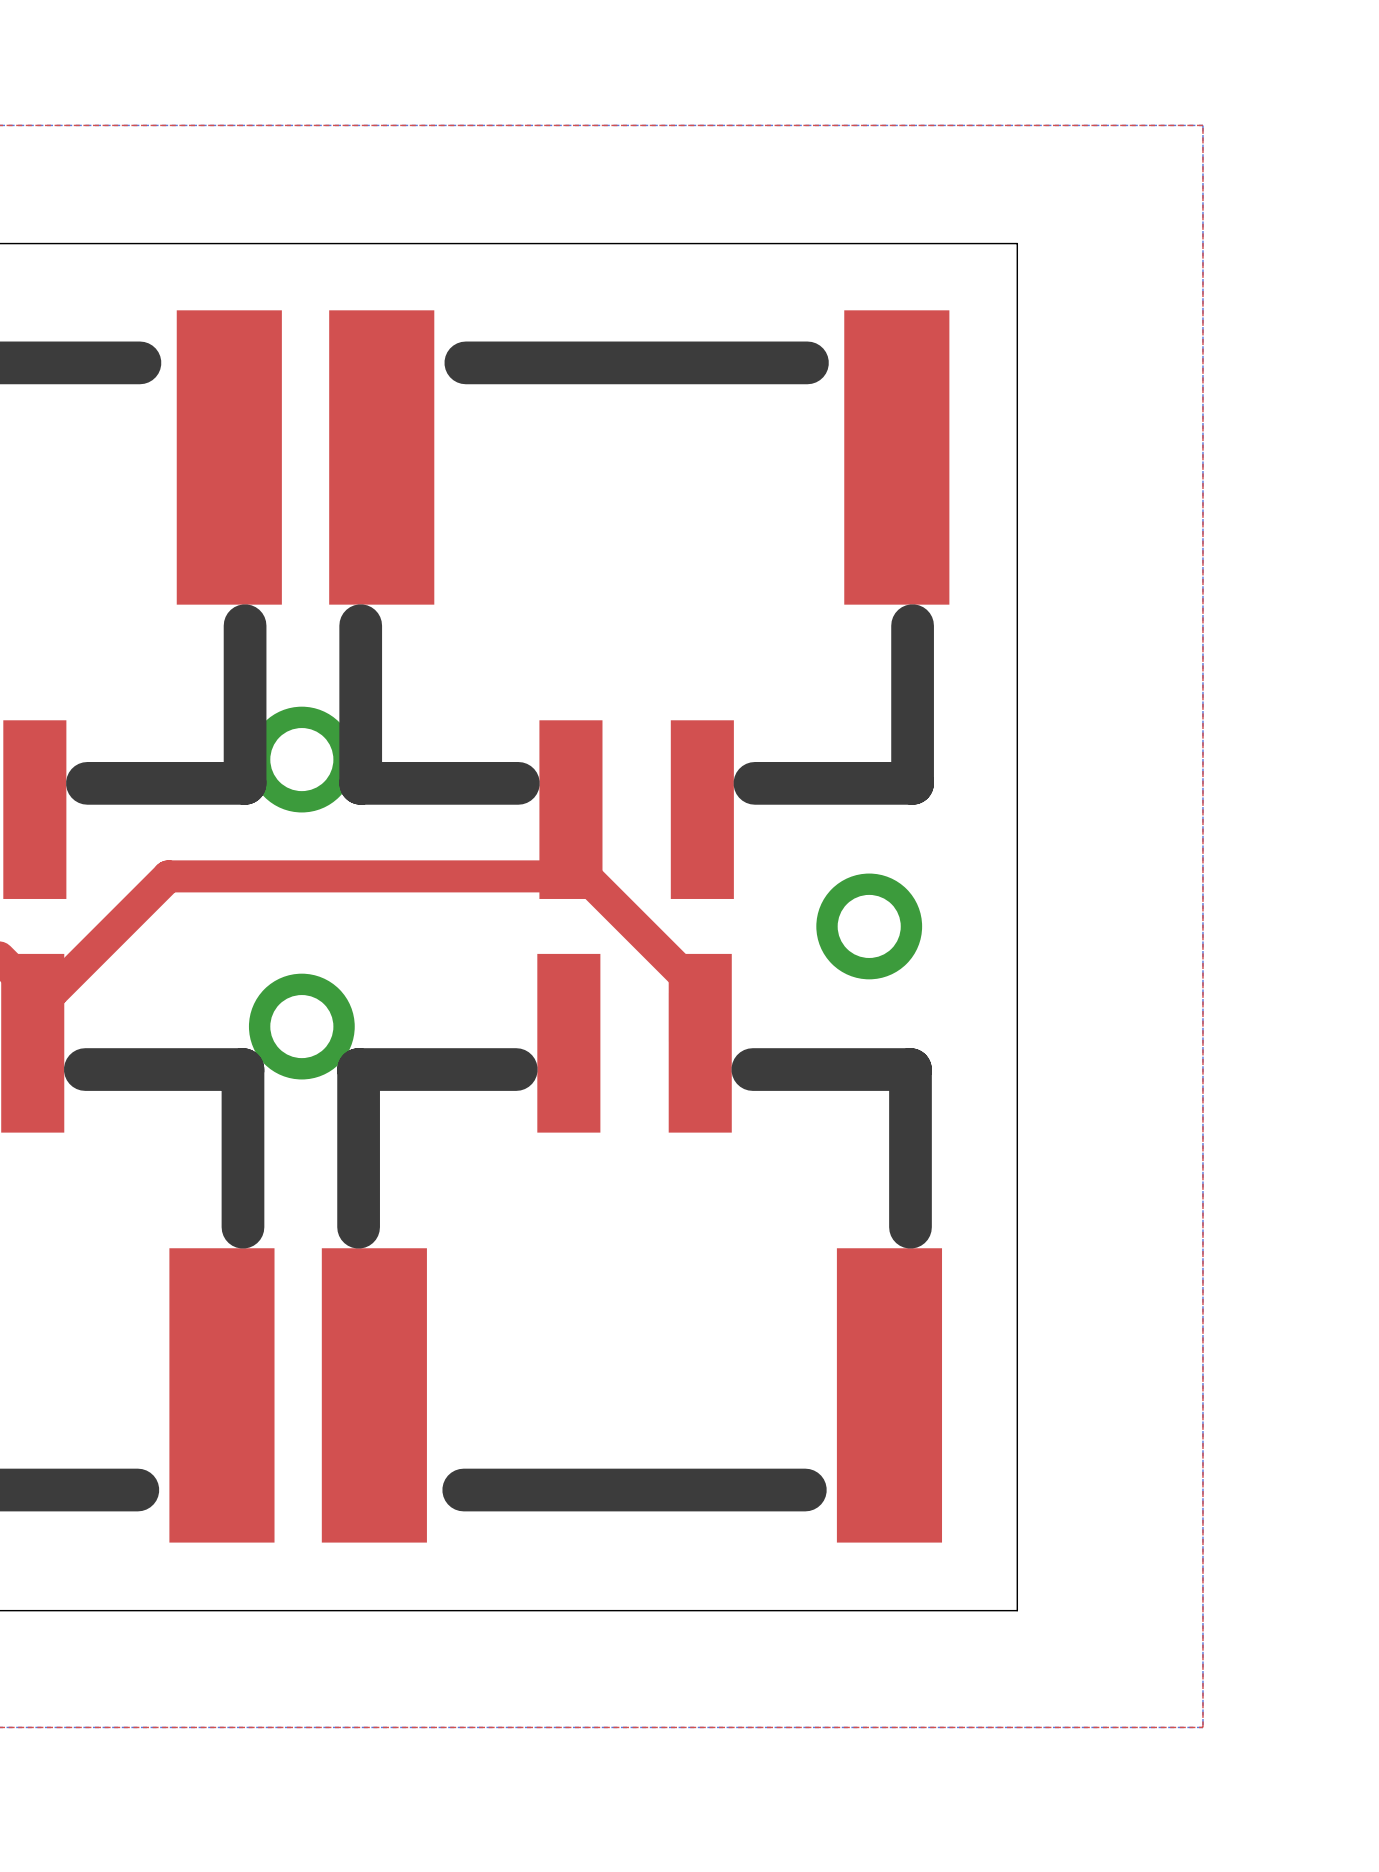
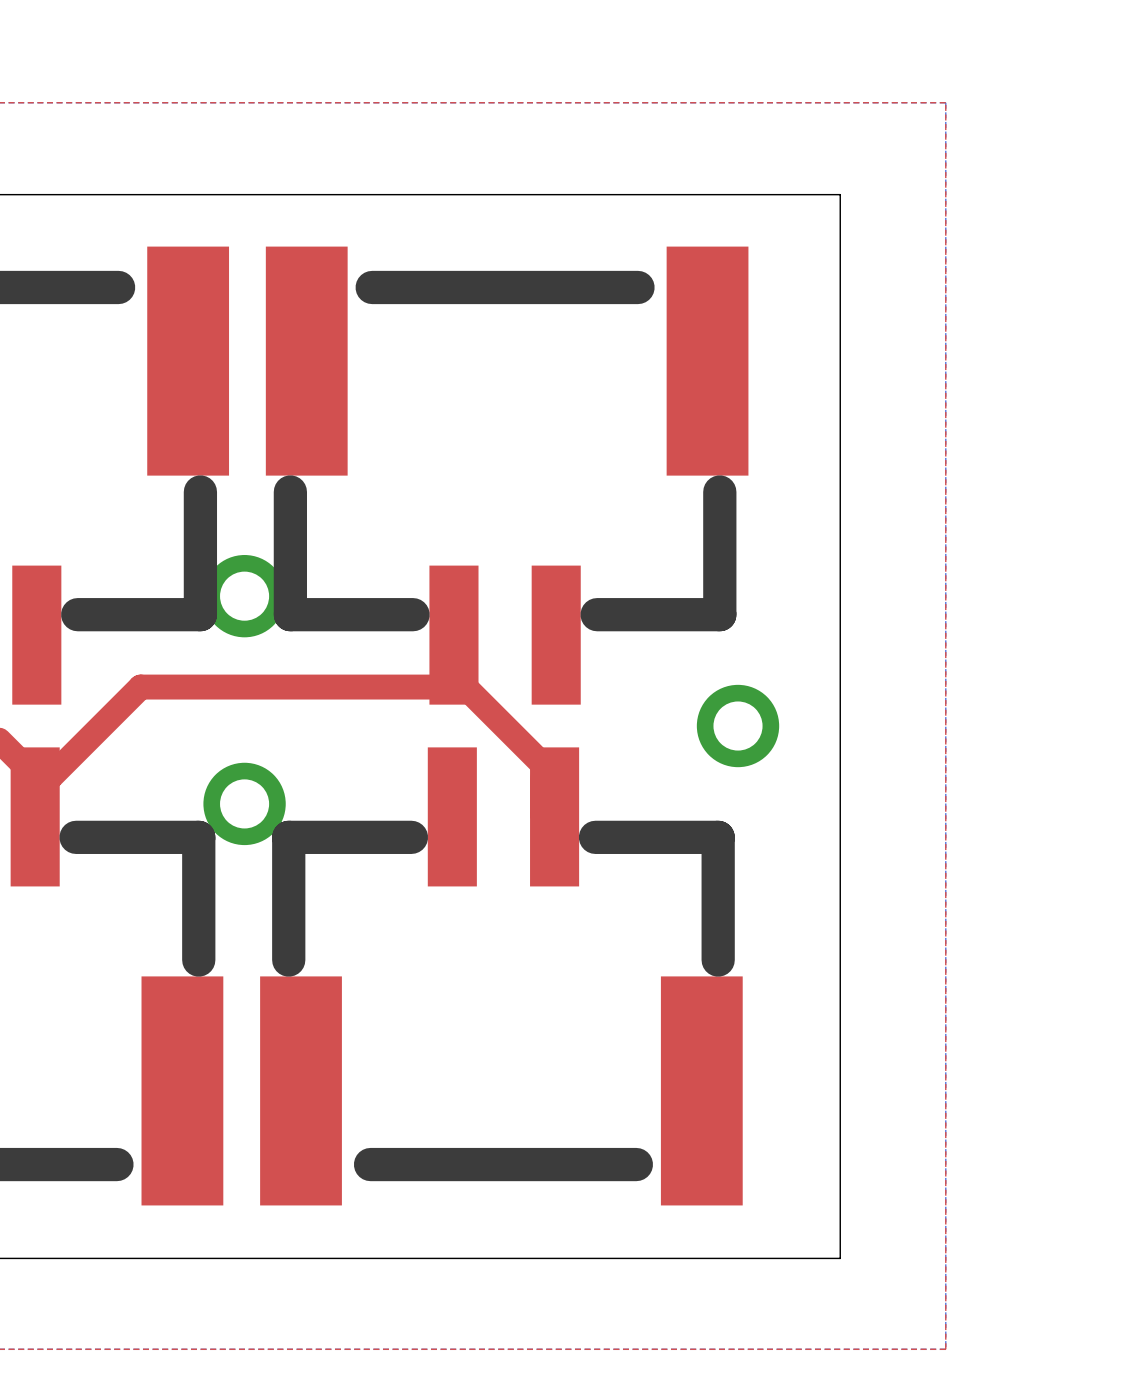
board edge: (1017, 243) (1017, 1610) -> (801, 194) (840, 194) (840, 1258) (801, 1258)
via position: (869, 926) -> (738, 726)

